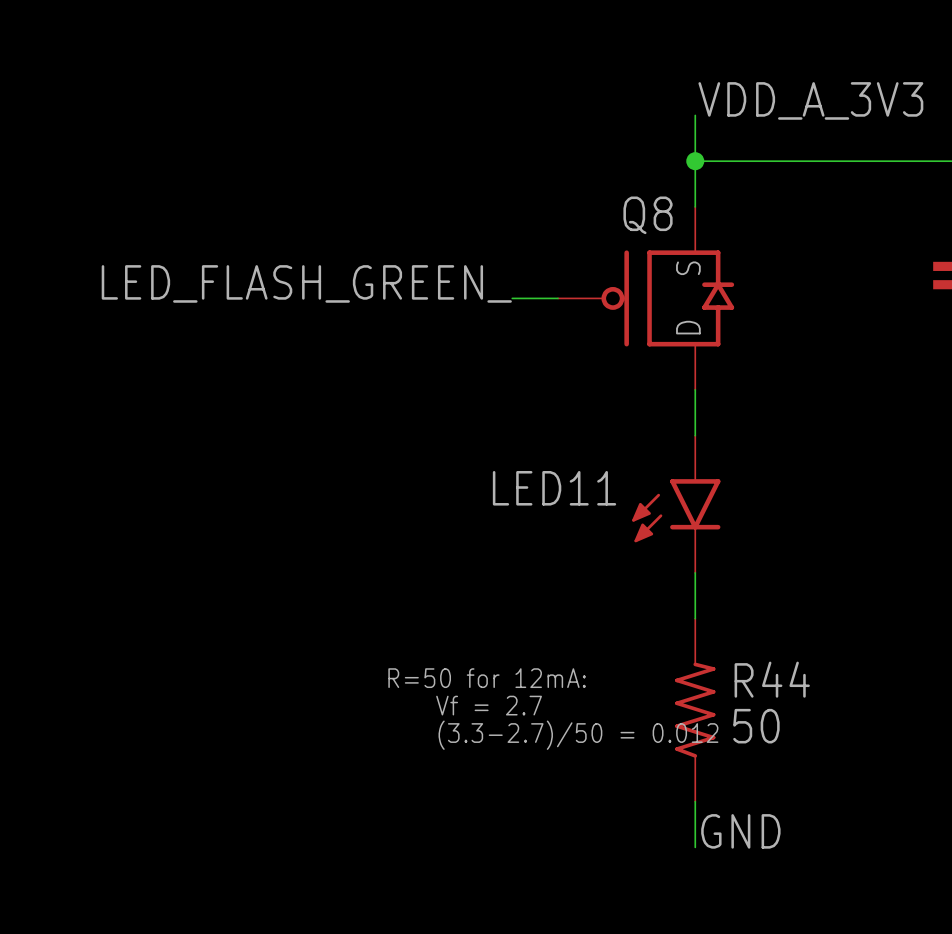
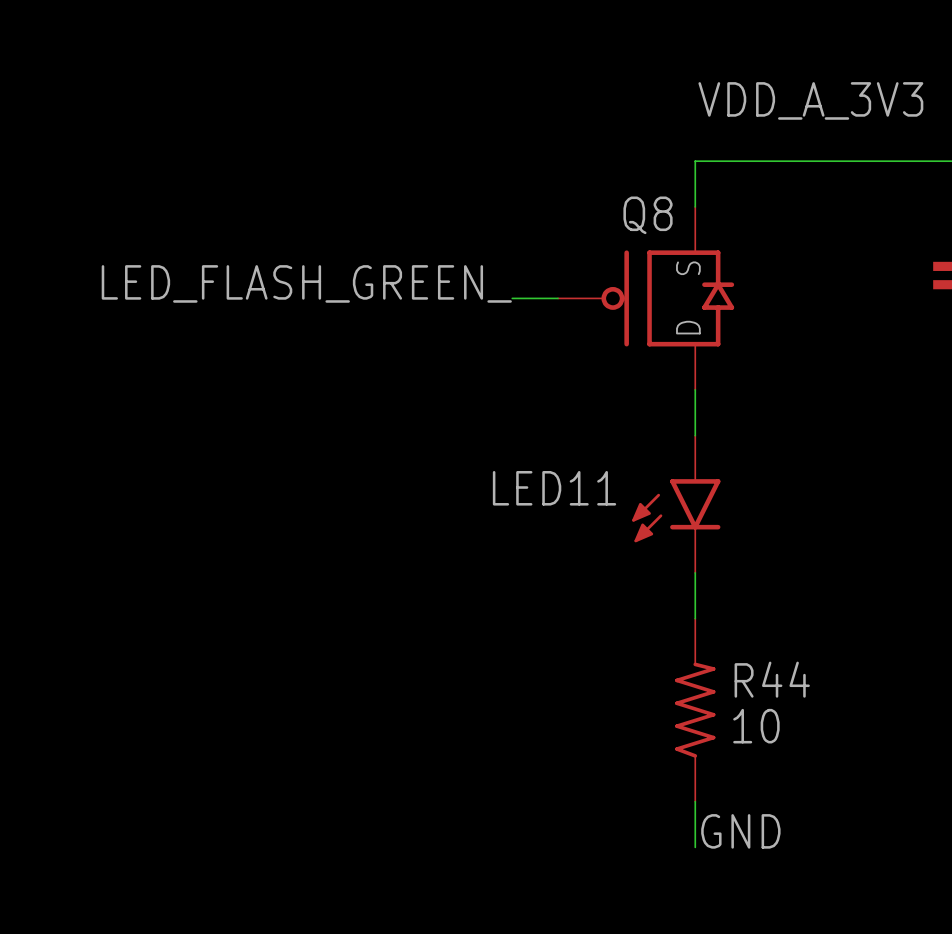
wire: (695, 115) (695, 161) -> none
junction: (695, 161) -> none
text: R=50 for 12mA: (487, 678) -> none
text: Vf = 2.7 (489, 705) -> none
R44 value: 50 (756, 726) -> 10 (756, 726)
text: (3.3-2.7)/50 = 0.012 (578, 735) -> none

